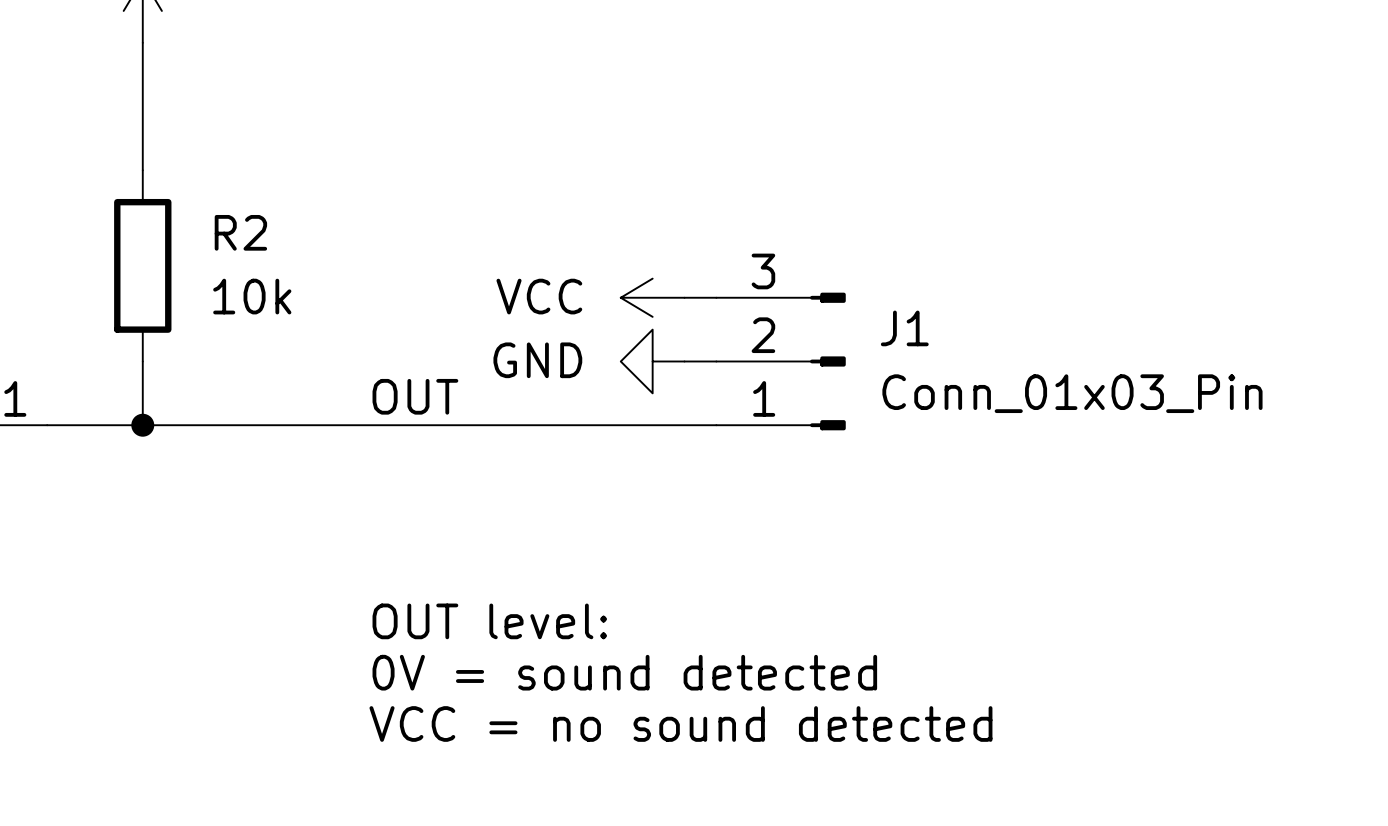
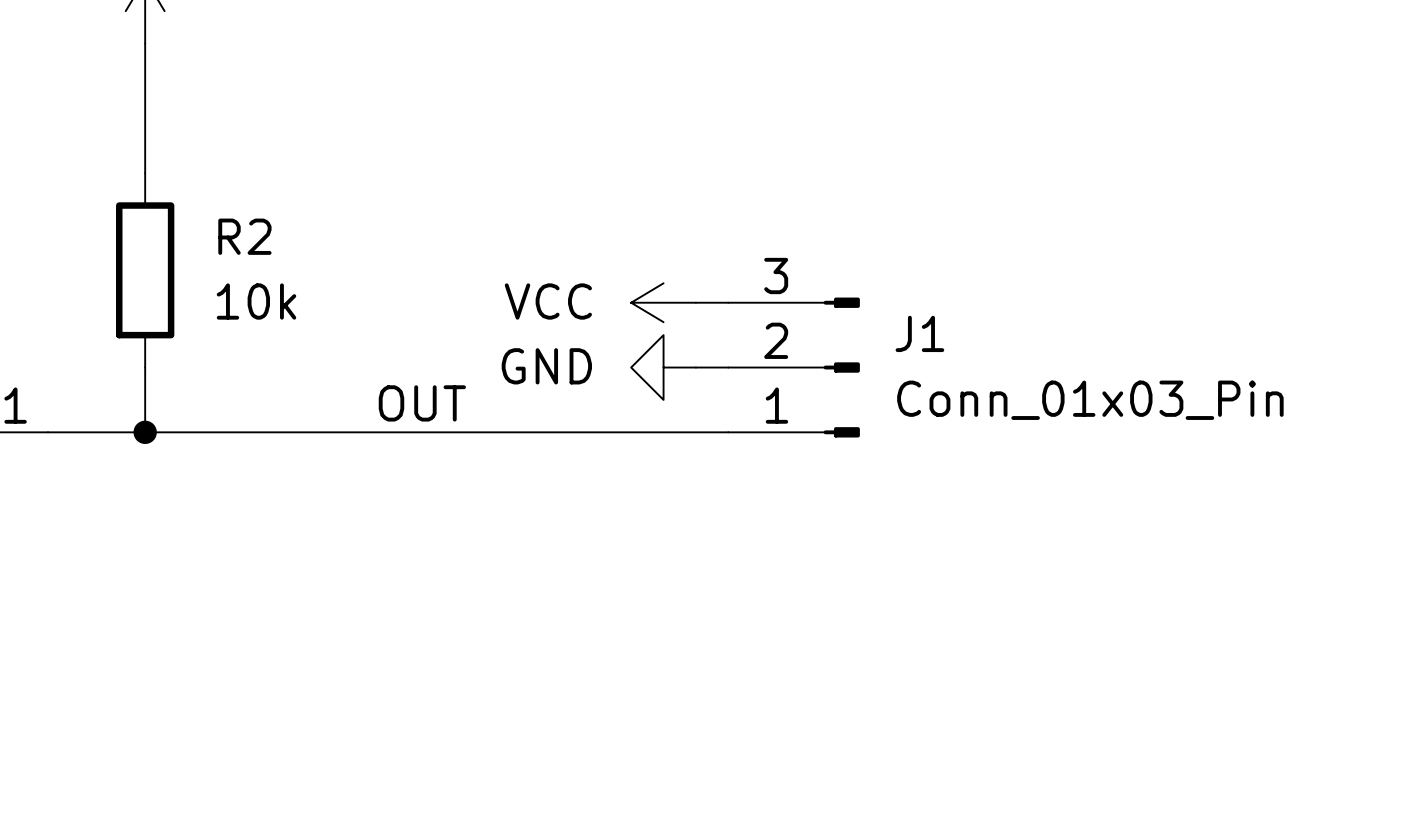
text: OUT level: (489, 621) -> none
text: 0V = sound detected (624, 672) -> none
text: VCC = no sound detected (680, 723) -> none

